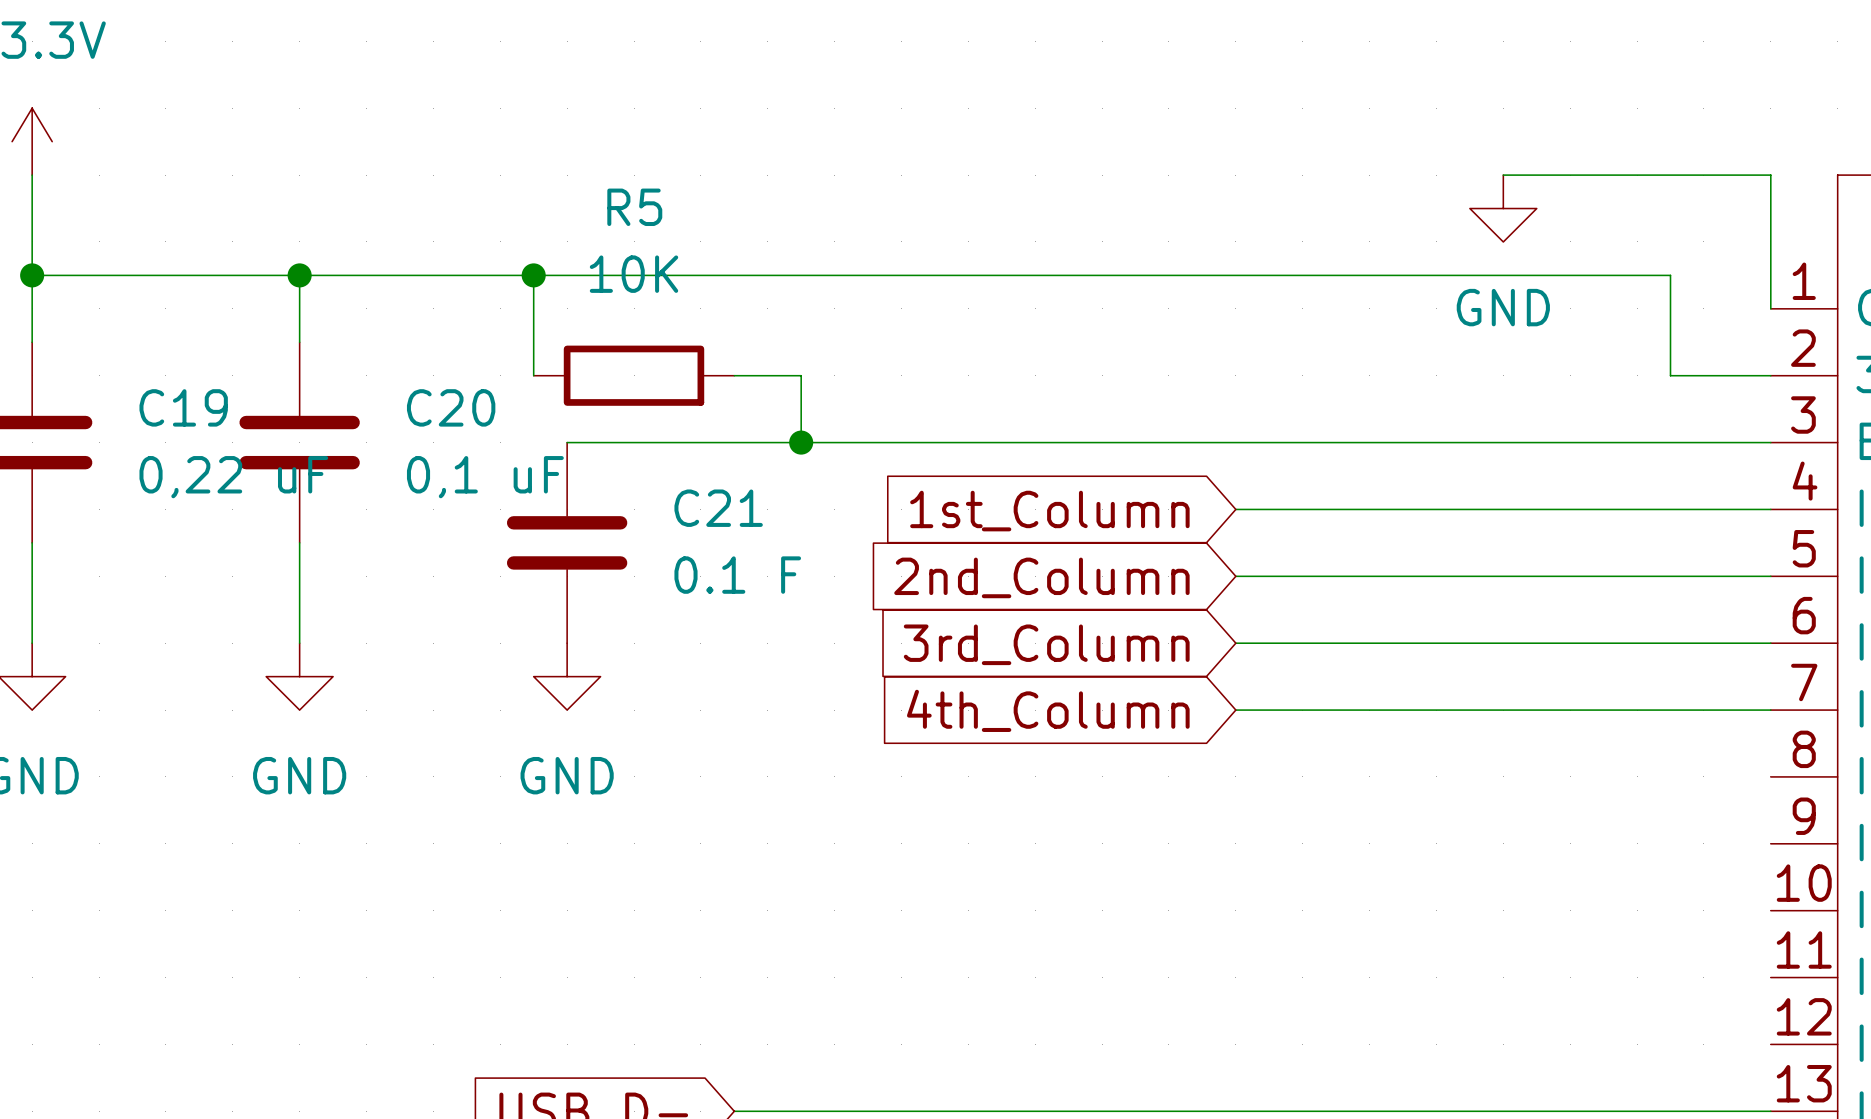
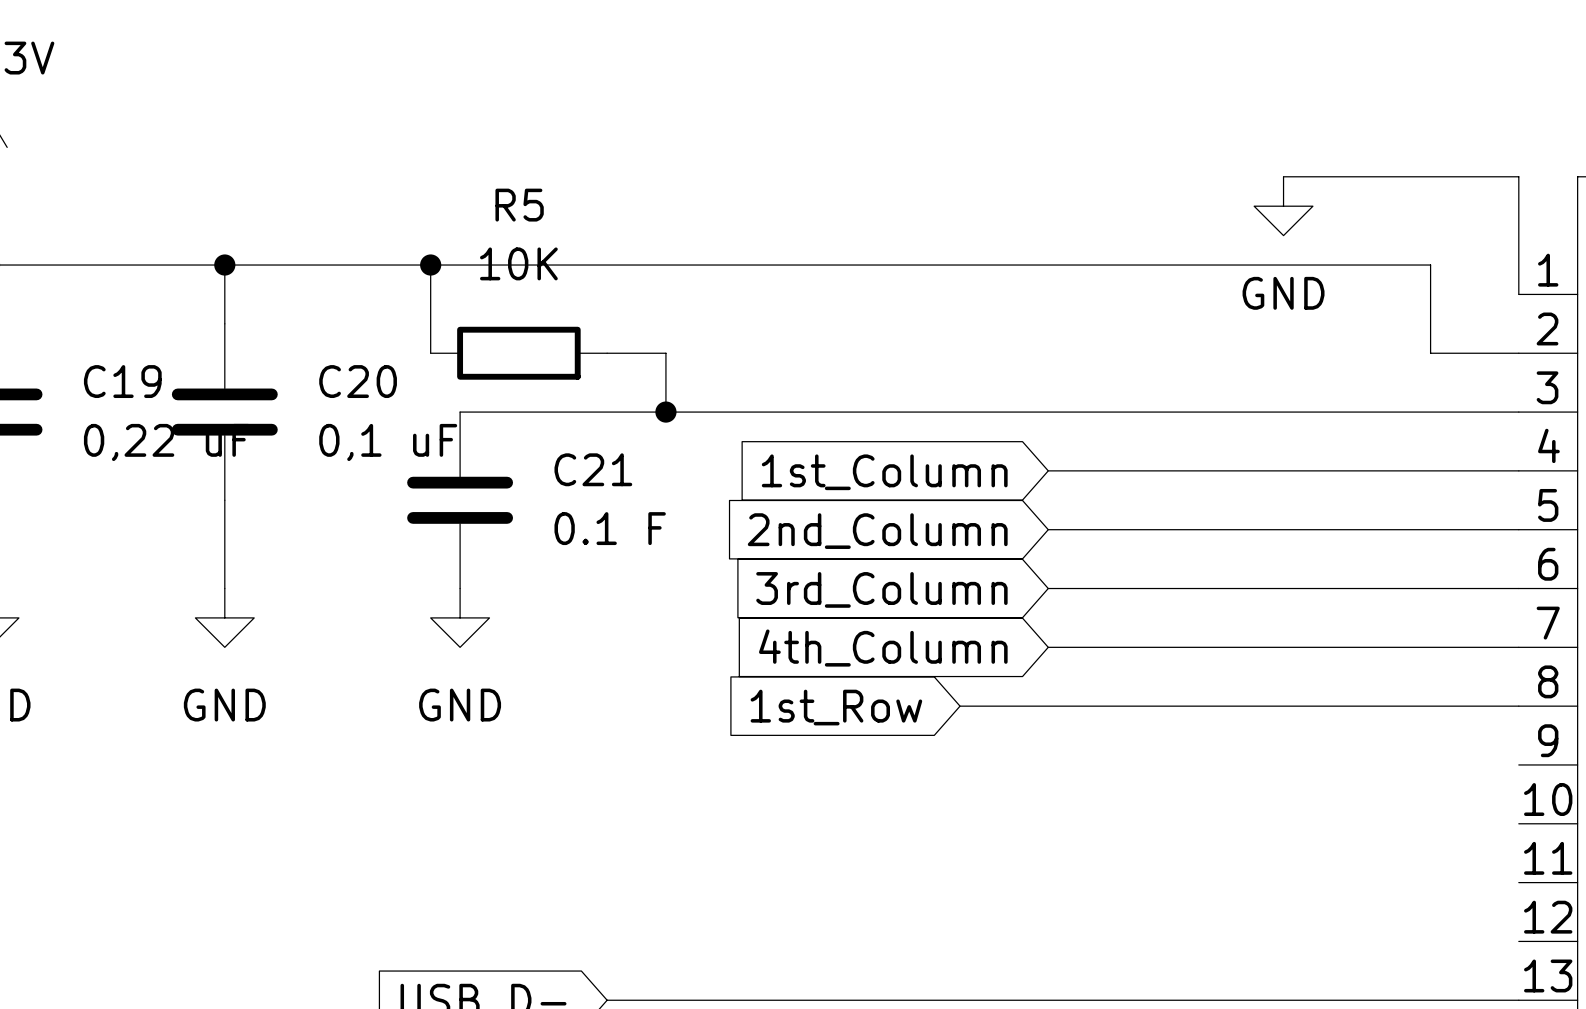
wire: none -> (960, 706) (1518, 706)
global label: none -> 1st_Row (836, 707)

